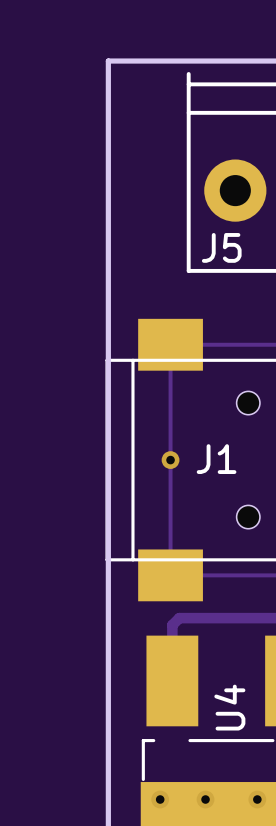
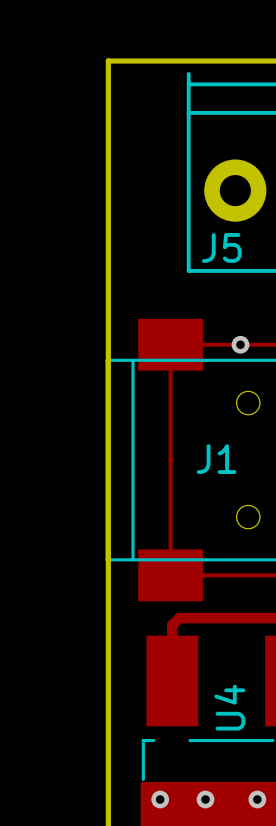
via position: (170, 460) -> (240, 344)

